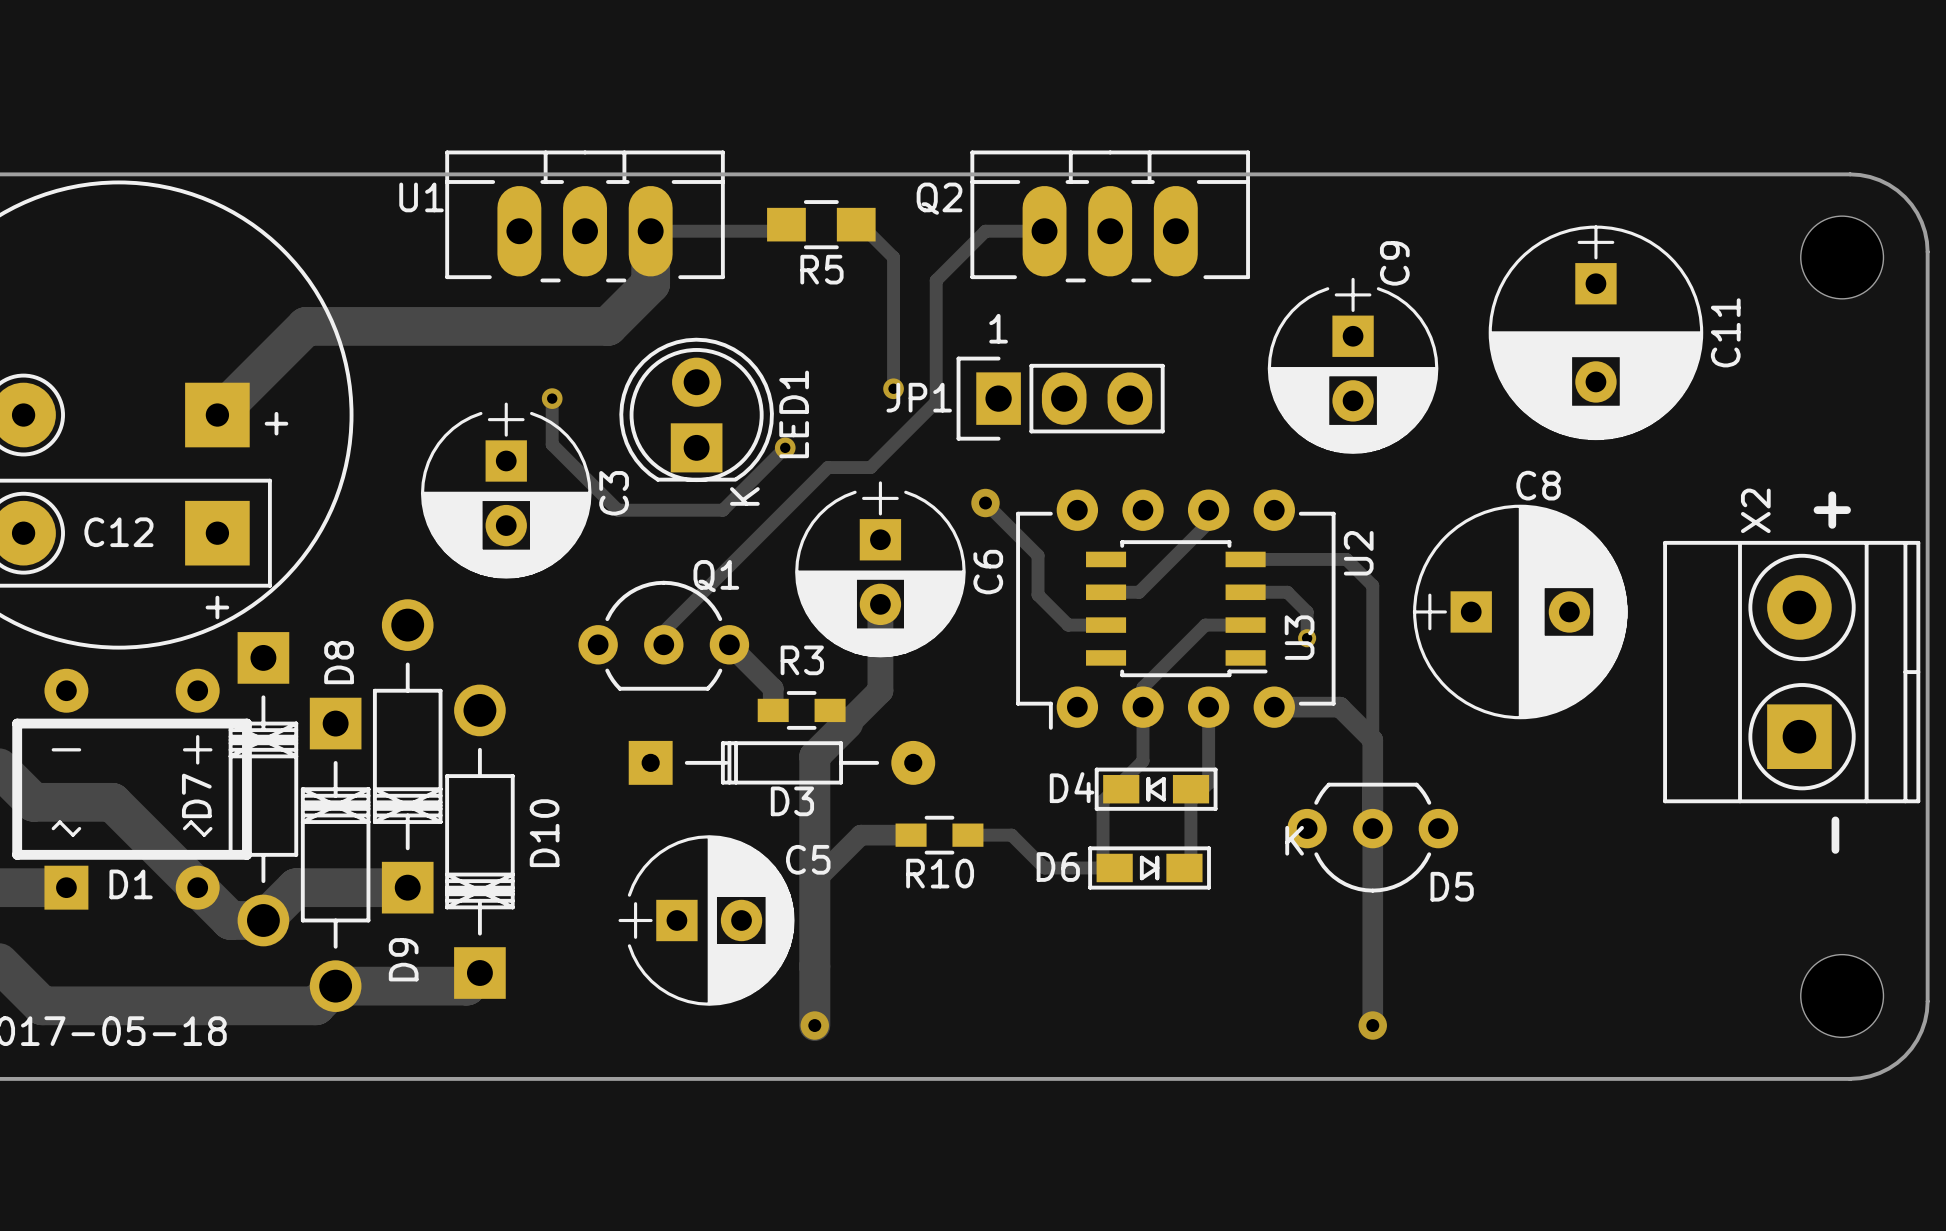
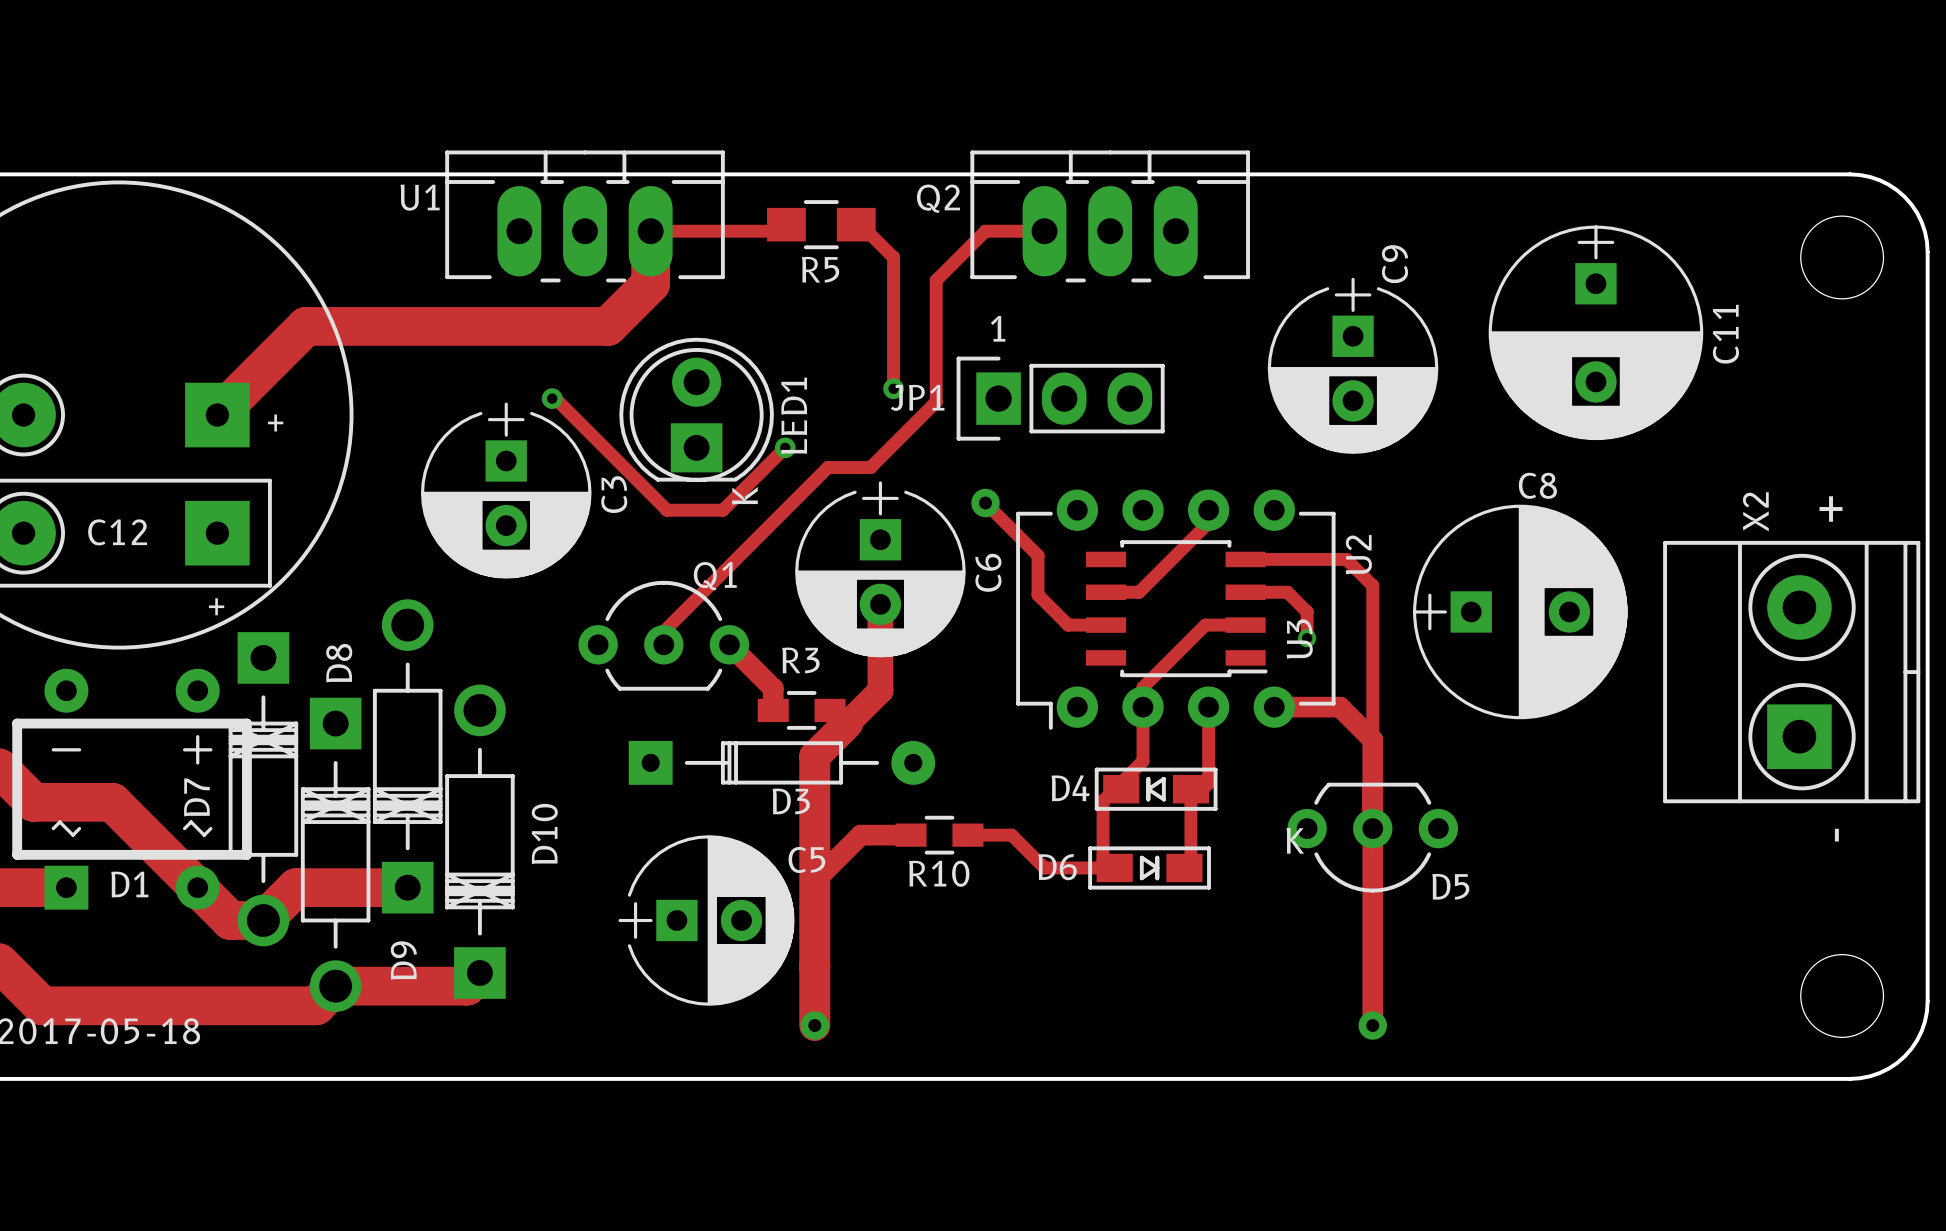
track: (552, 398) (552, 444) (617, 510) (667, 510) -> (552, 398) (552, 395) (667, 510)

